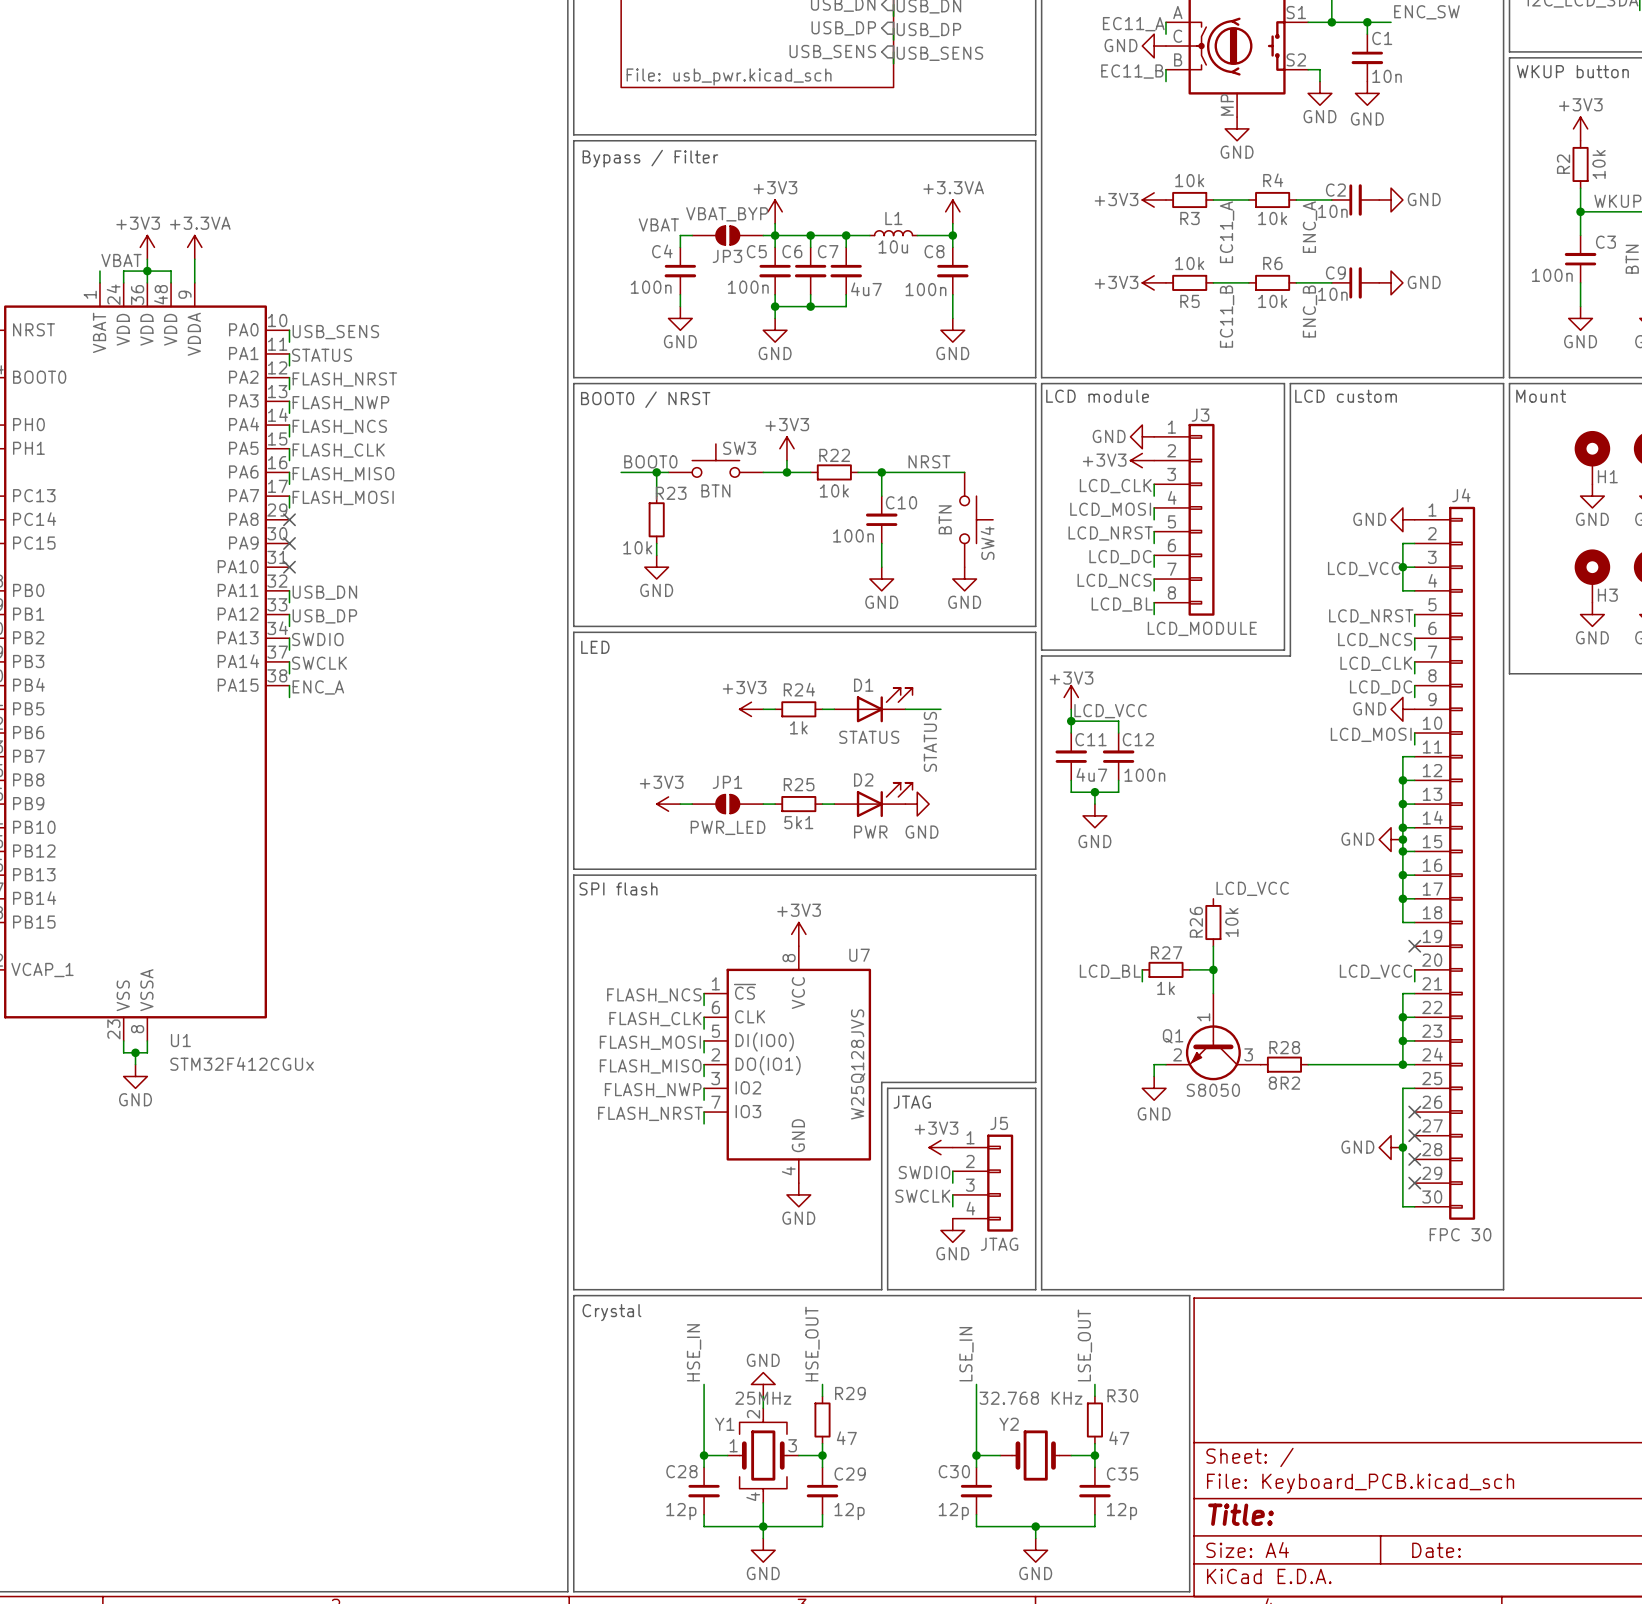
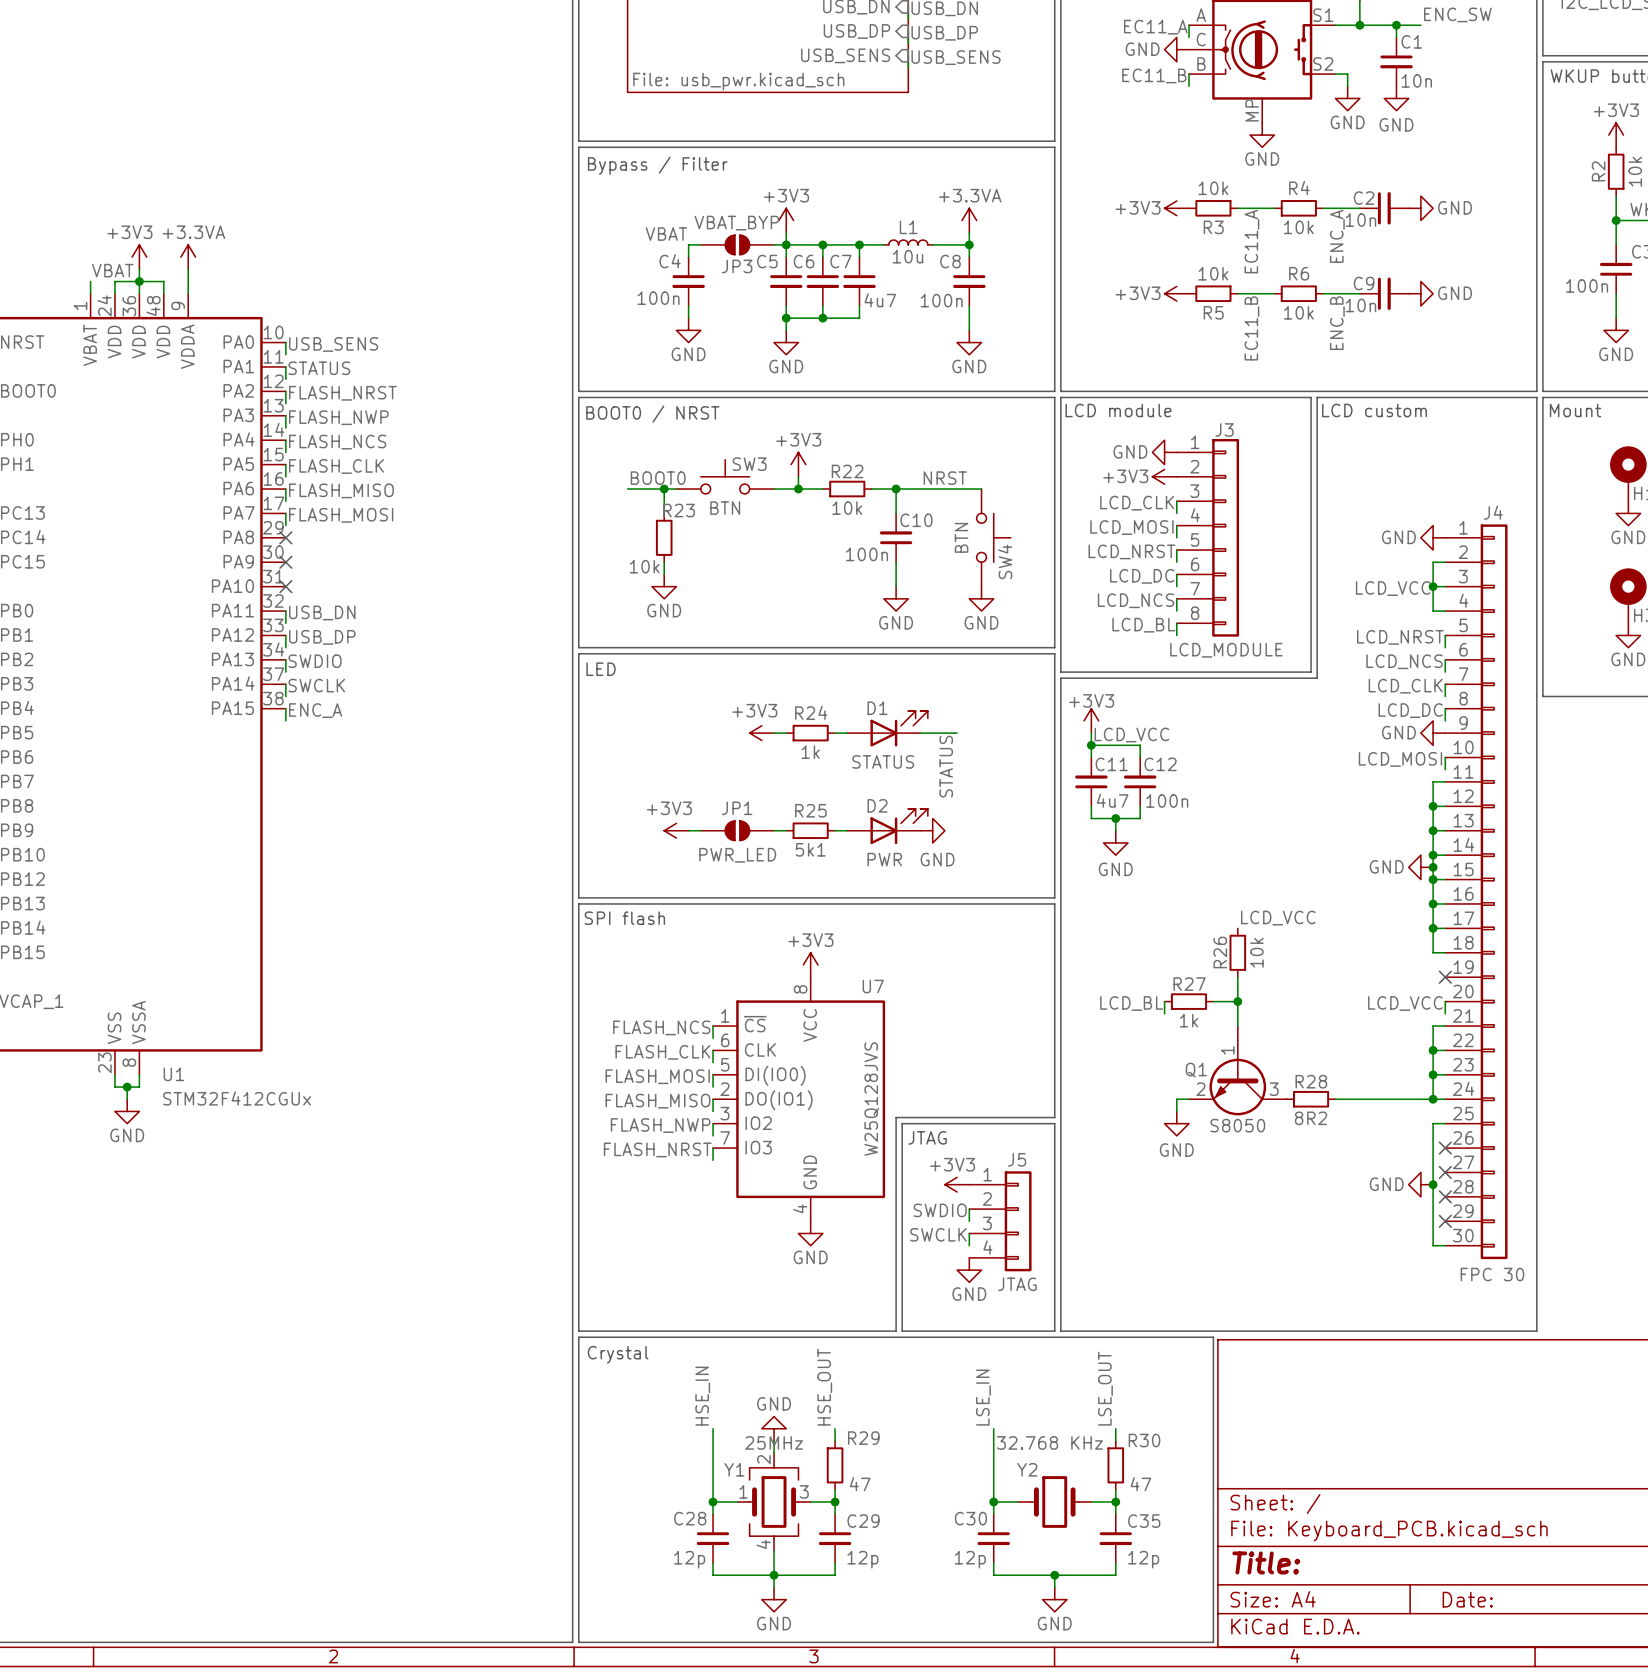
C5 value: 100n (748, 287) -> none

